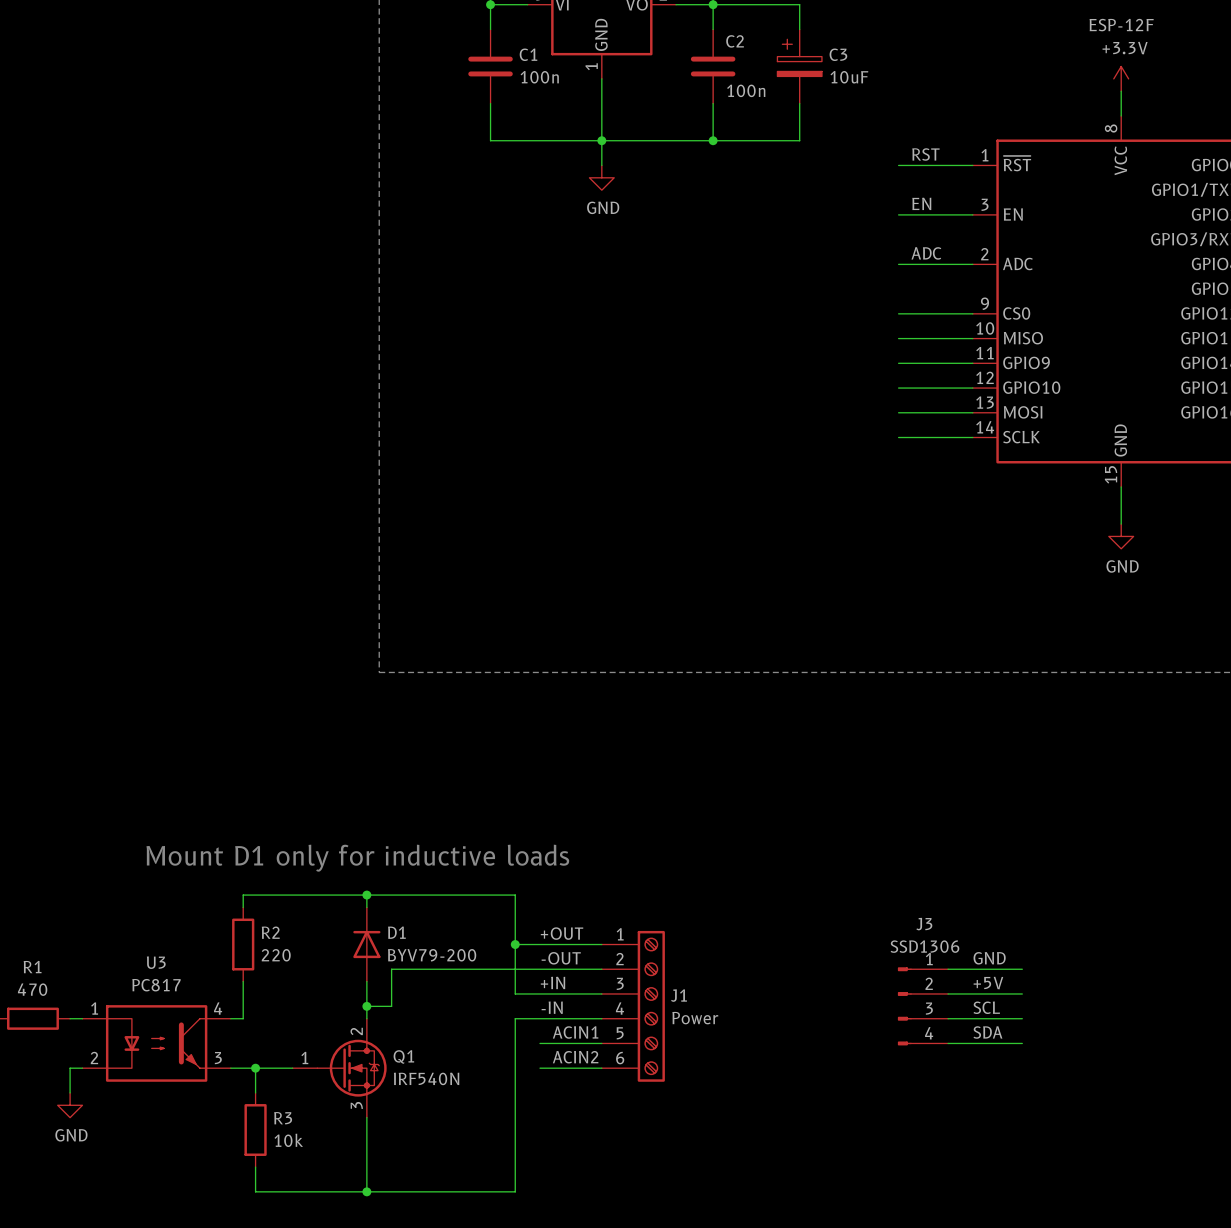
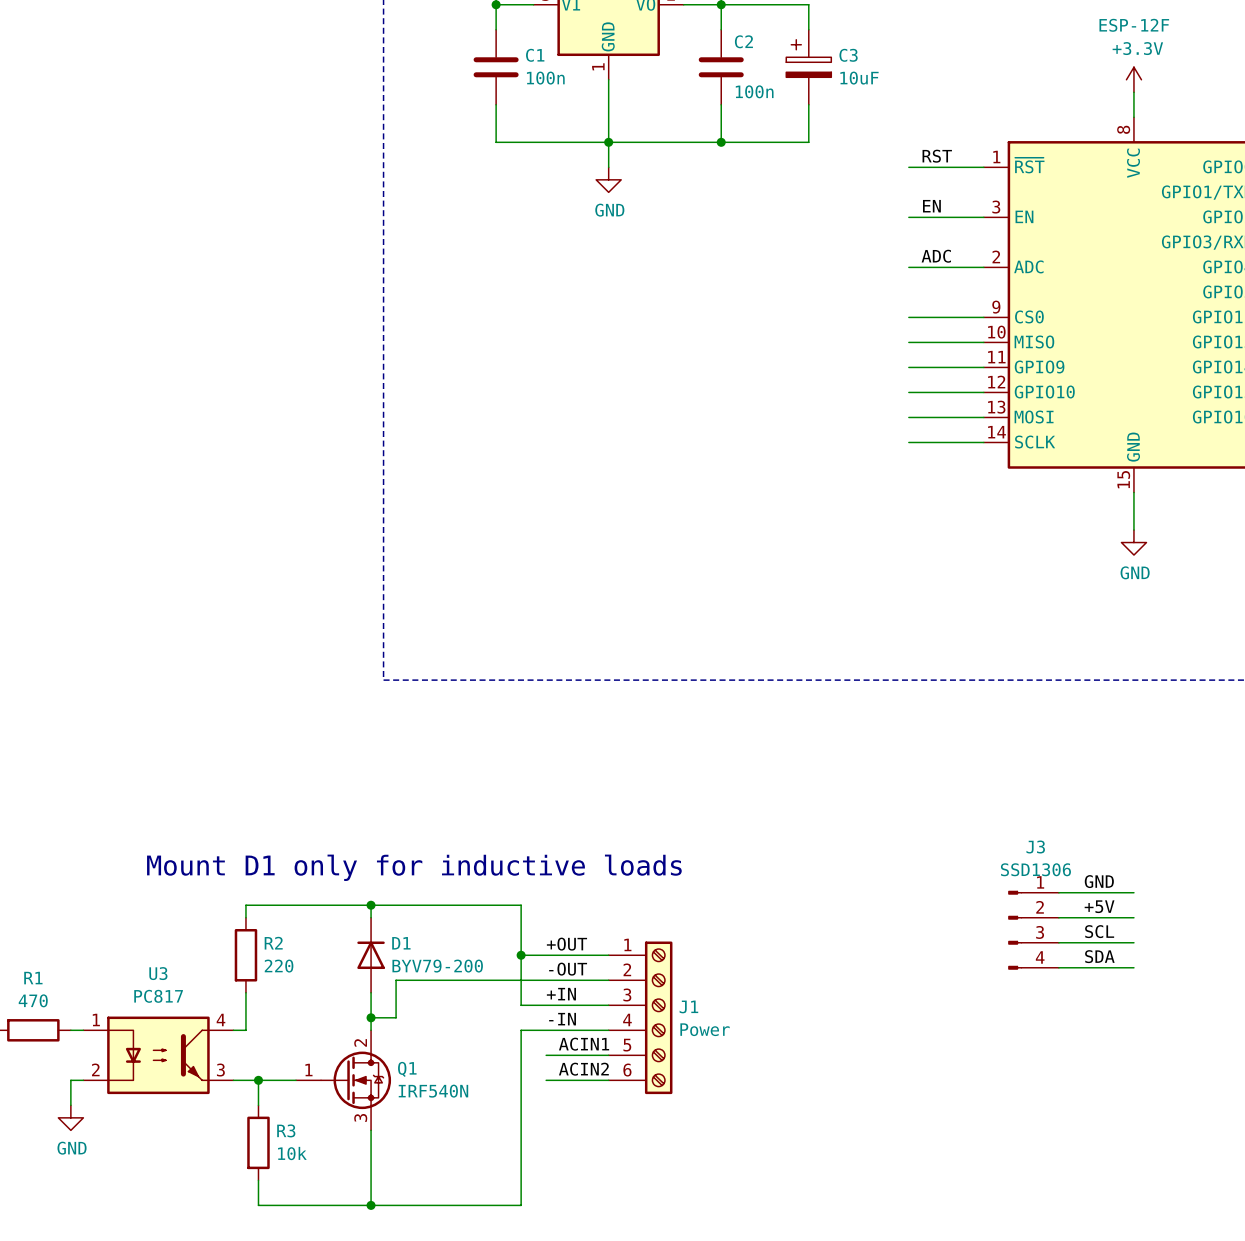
label position: GND (989, 958) -> GND (1099, 881)
wire: (948, 969) (1022, 969) -> (1058, 967) (1133, 967)
label position: +5V (988, 983) -> +5V (1099, 906)
wire: (948, 993) (1022, 993) -> (1058, 942) (1133, 942)
J3 position: (922, 1006) -> (1033, 930)
label position: SCL (986, 1007) -> SCL (1099, 931)
wire: (948, 1018) (1022, 1018) -> (1058, 917) (1133, 917)
label position: SDA (987, 1032) -> SDA (1099, 956)
wire: (948, 1043) (1022, 1043) -> (1058, 892) (1133, 892)

